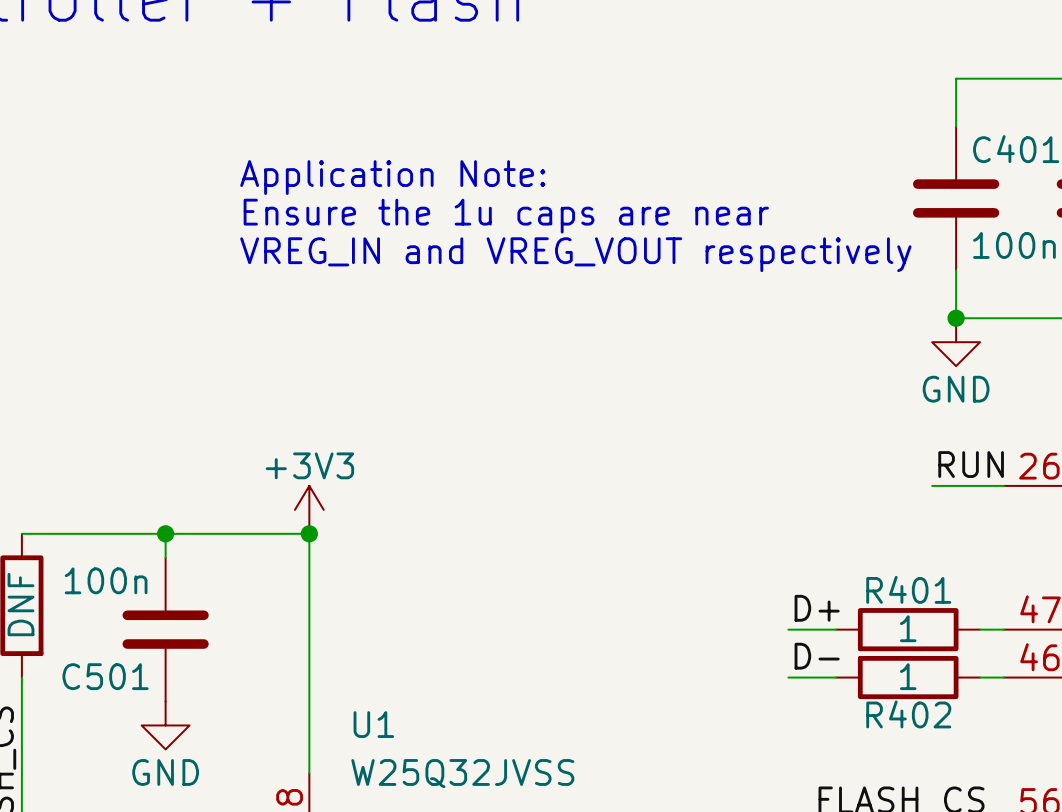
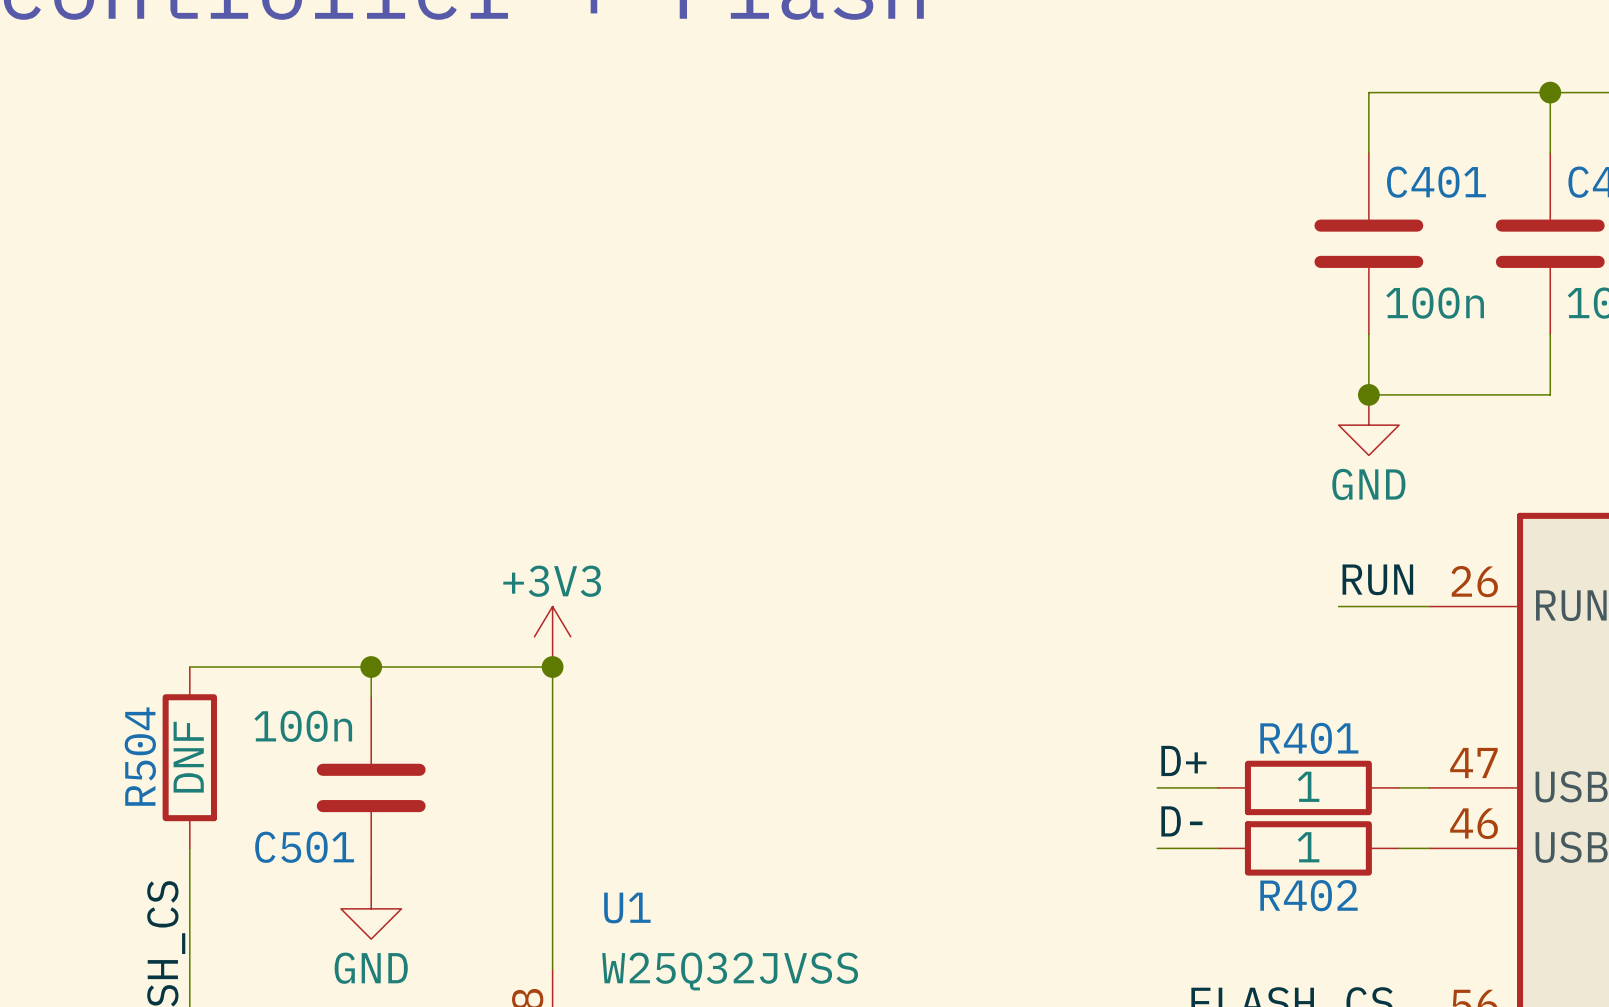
text: Application Note: (392, 177) -> none
text: Ensure the 1u caps are near (506, 216) -> none
text: VREG_IN and VREG_VOUT respectively (575, 254) -> none

